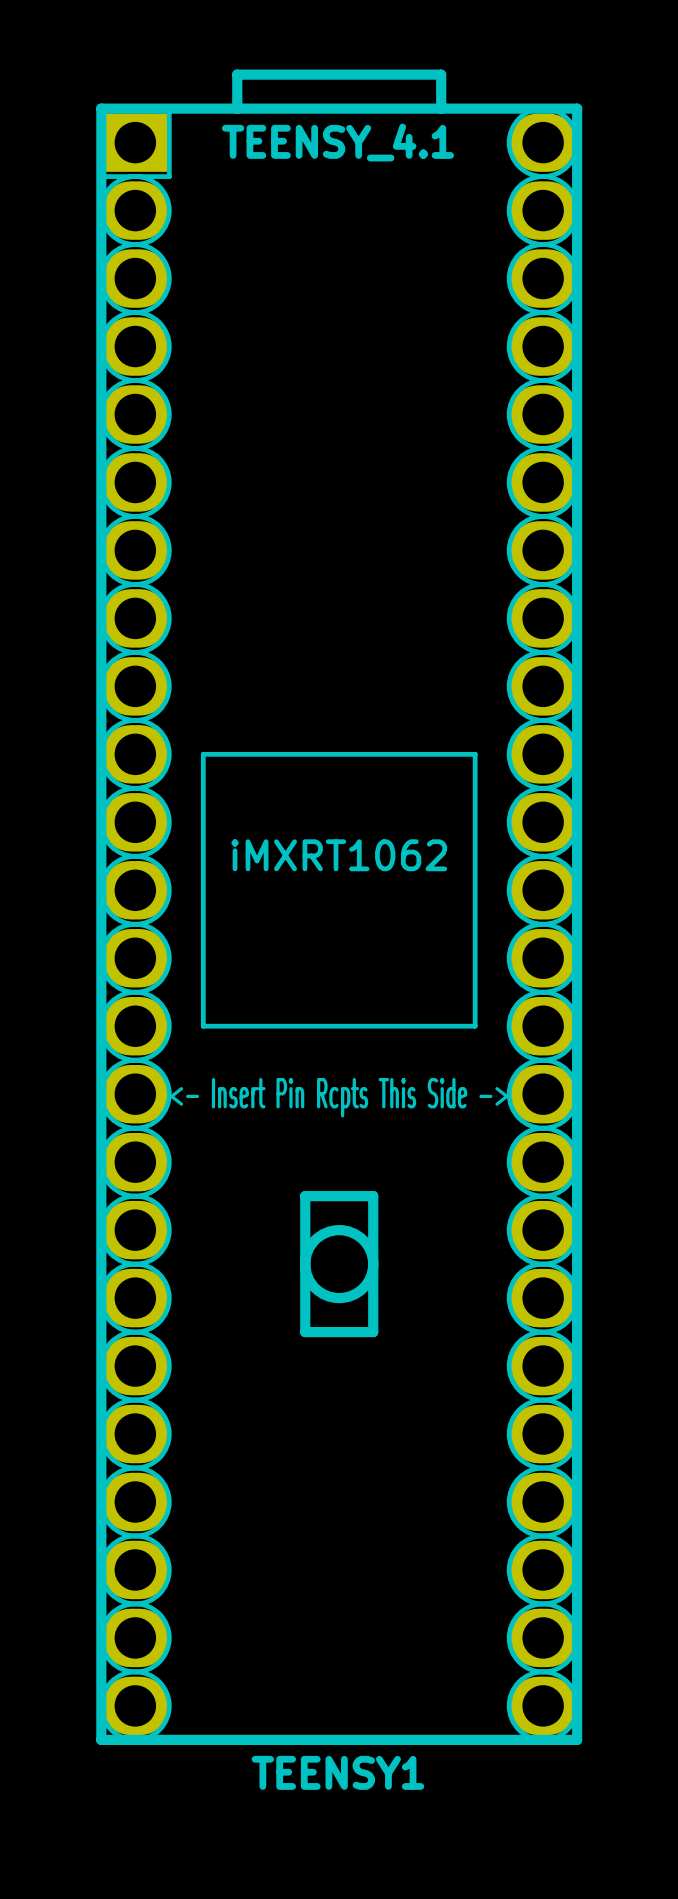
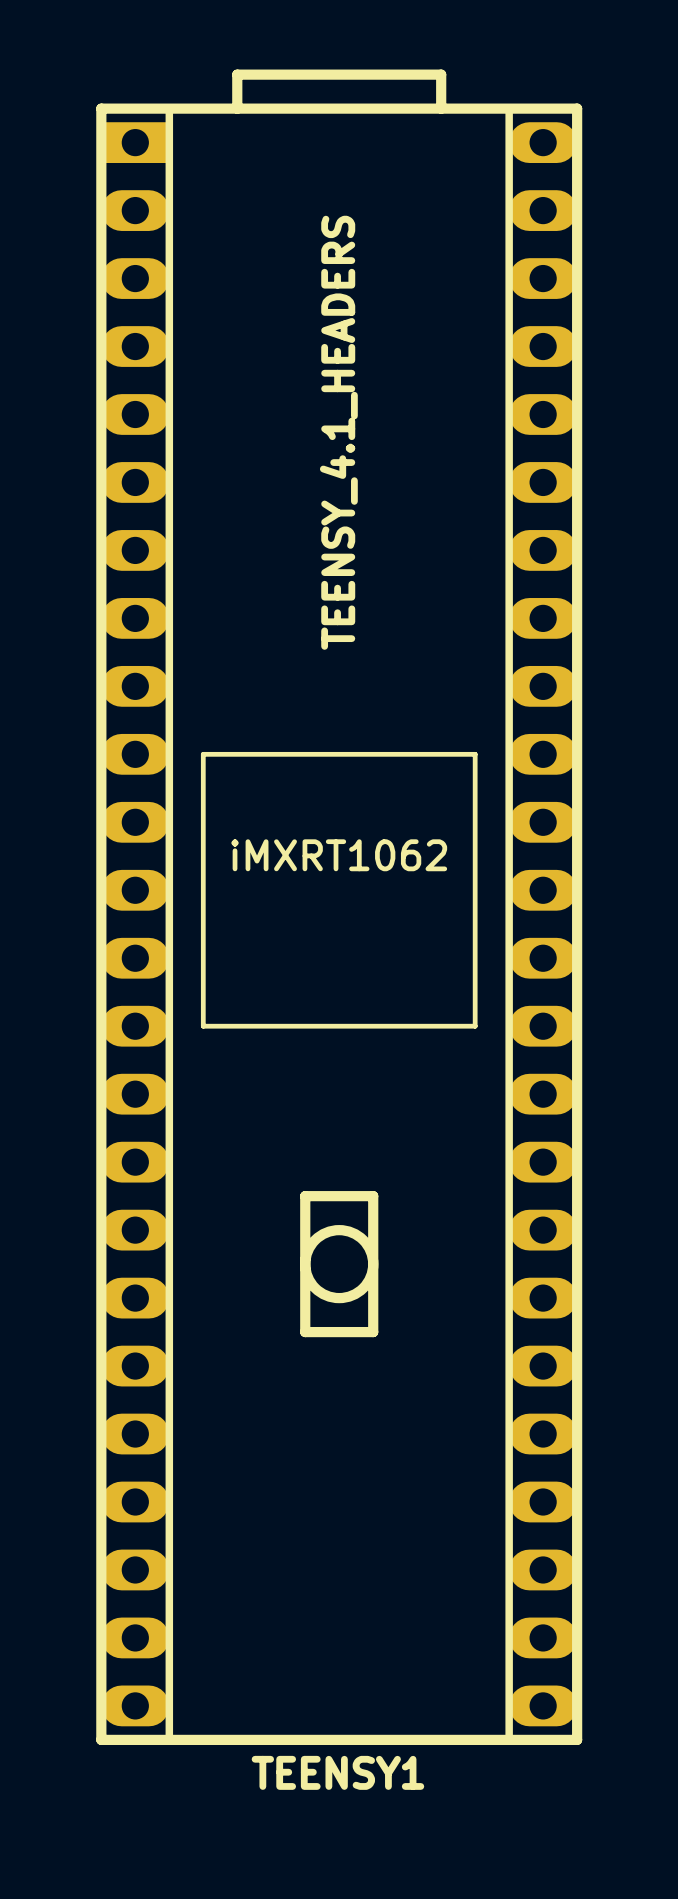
TEENSY1 footprint: [96, 69, 583, 1746] -> [96, 69, 583, 1746]
TEENSY1 value: TEENSY_4.1 (337, 142) -> TEENSY_4.1_HEADERS (338, 432)

